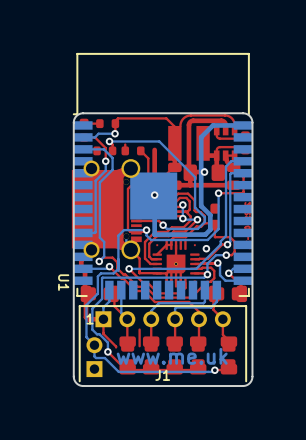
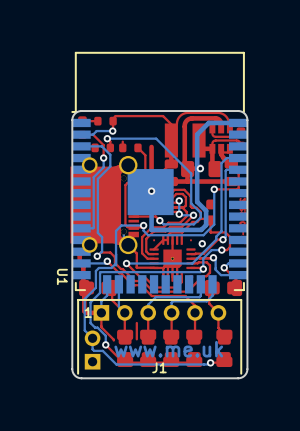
part footprint: [168, 114, 250, 190] -> [164, 111, 246, 187]

